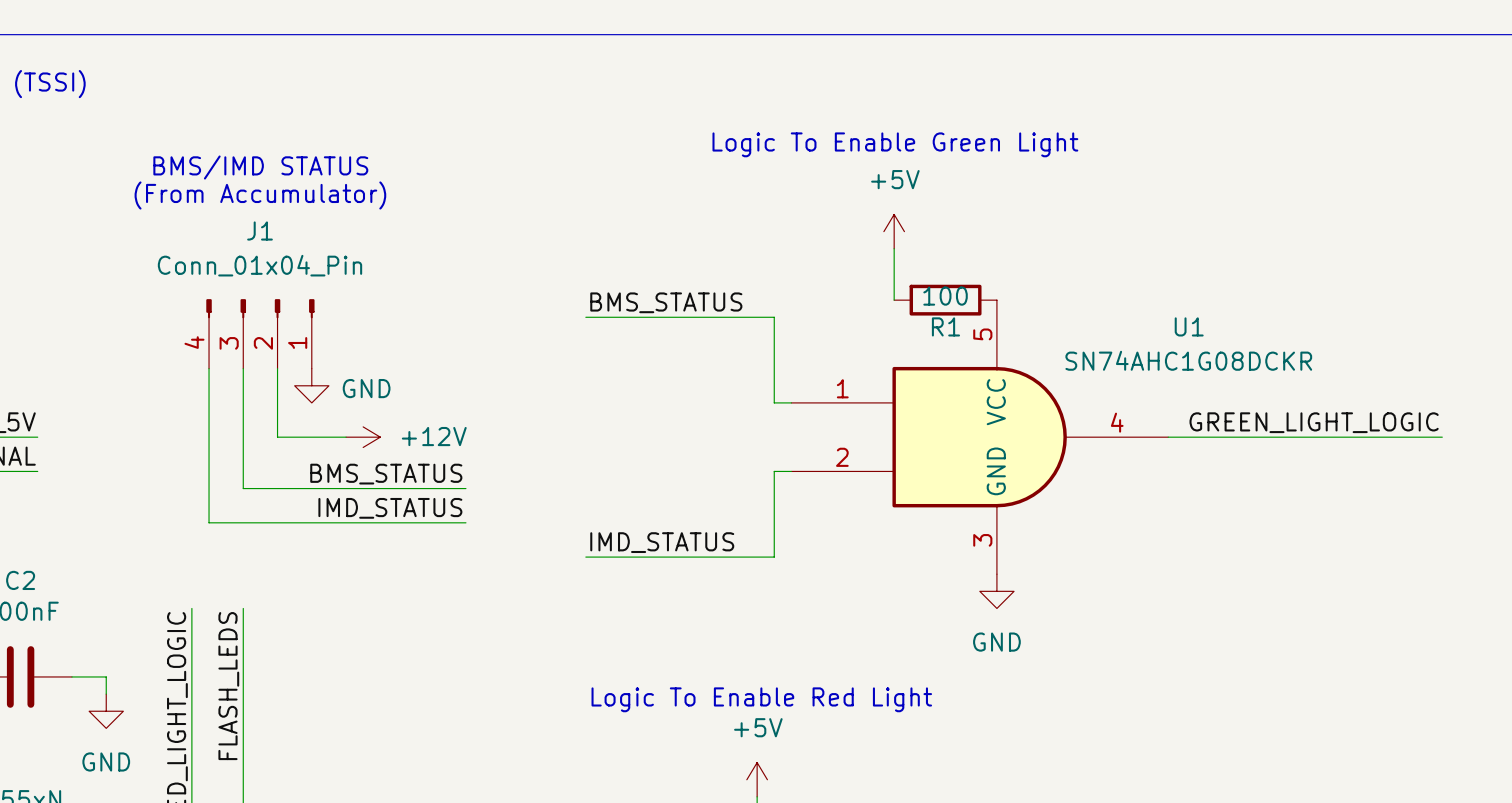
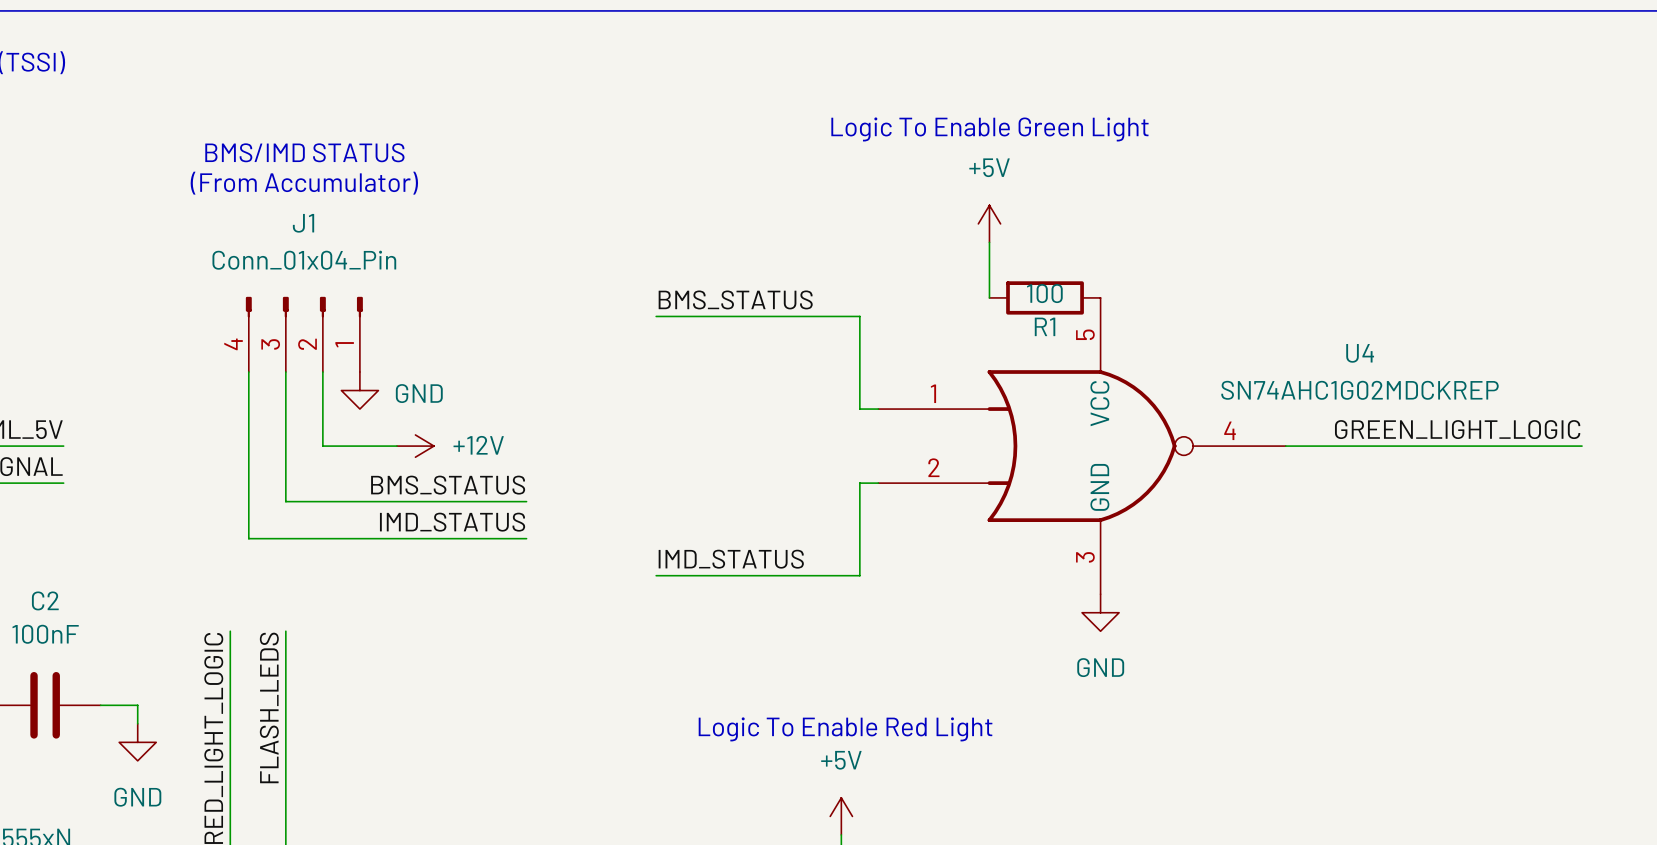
U1: SN74AHC1G08DCKR (979, 437) -> none
U4: none -> SN74AHC1G02MDCKREP (1082, 446)

